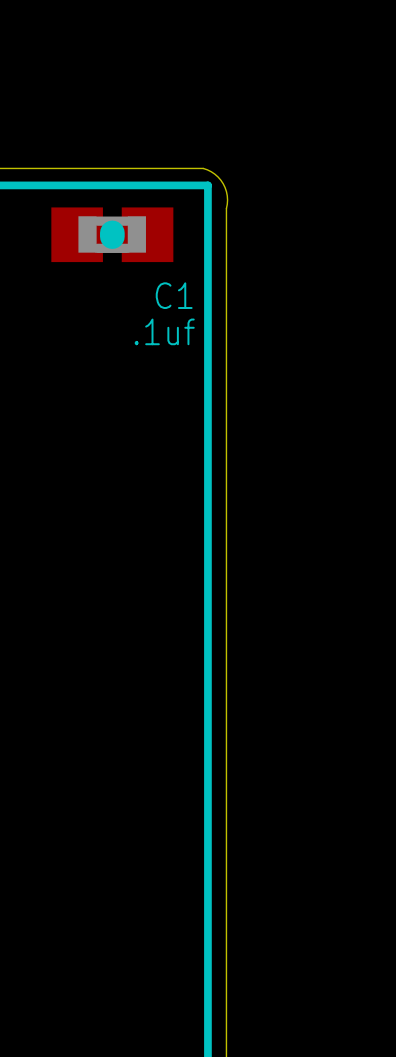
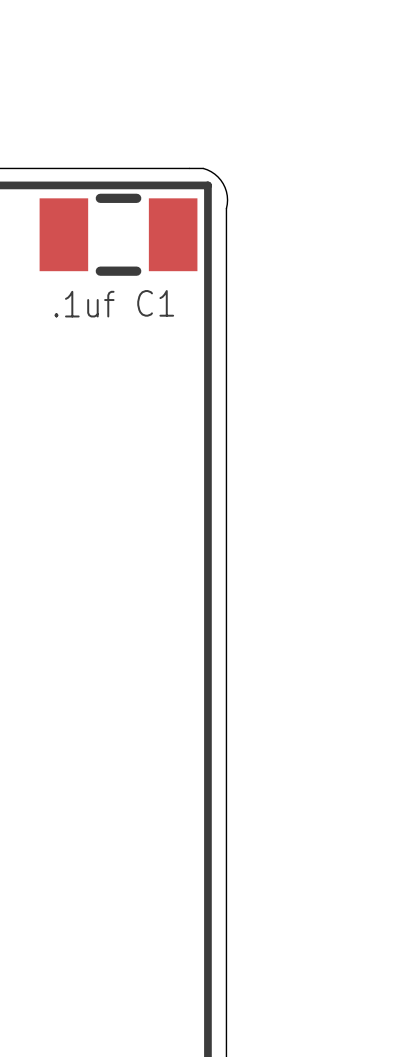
C1 footprint: [51, 207, 174, 263] -> [39, 193, 198, 276]

